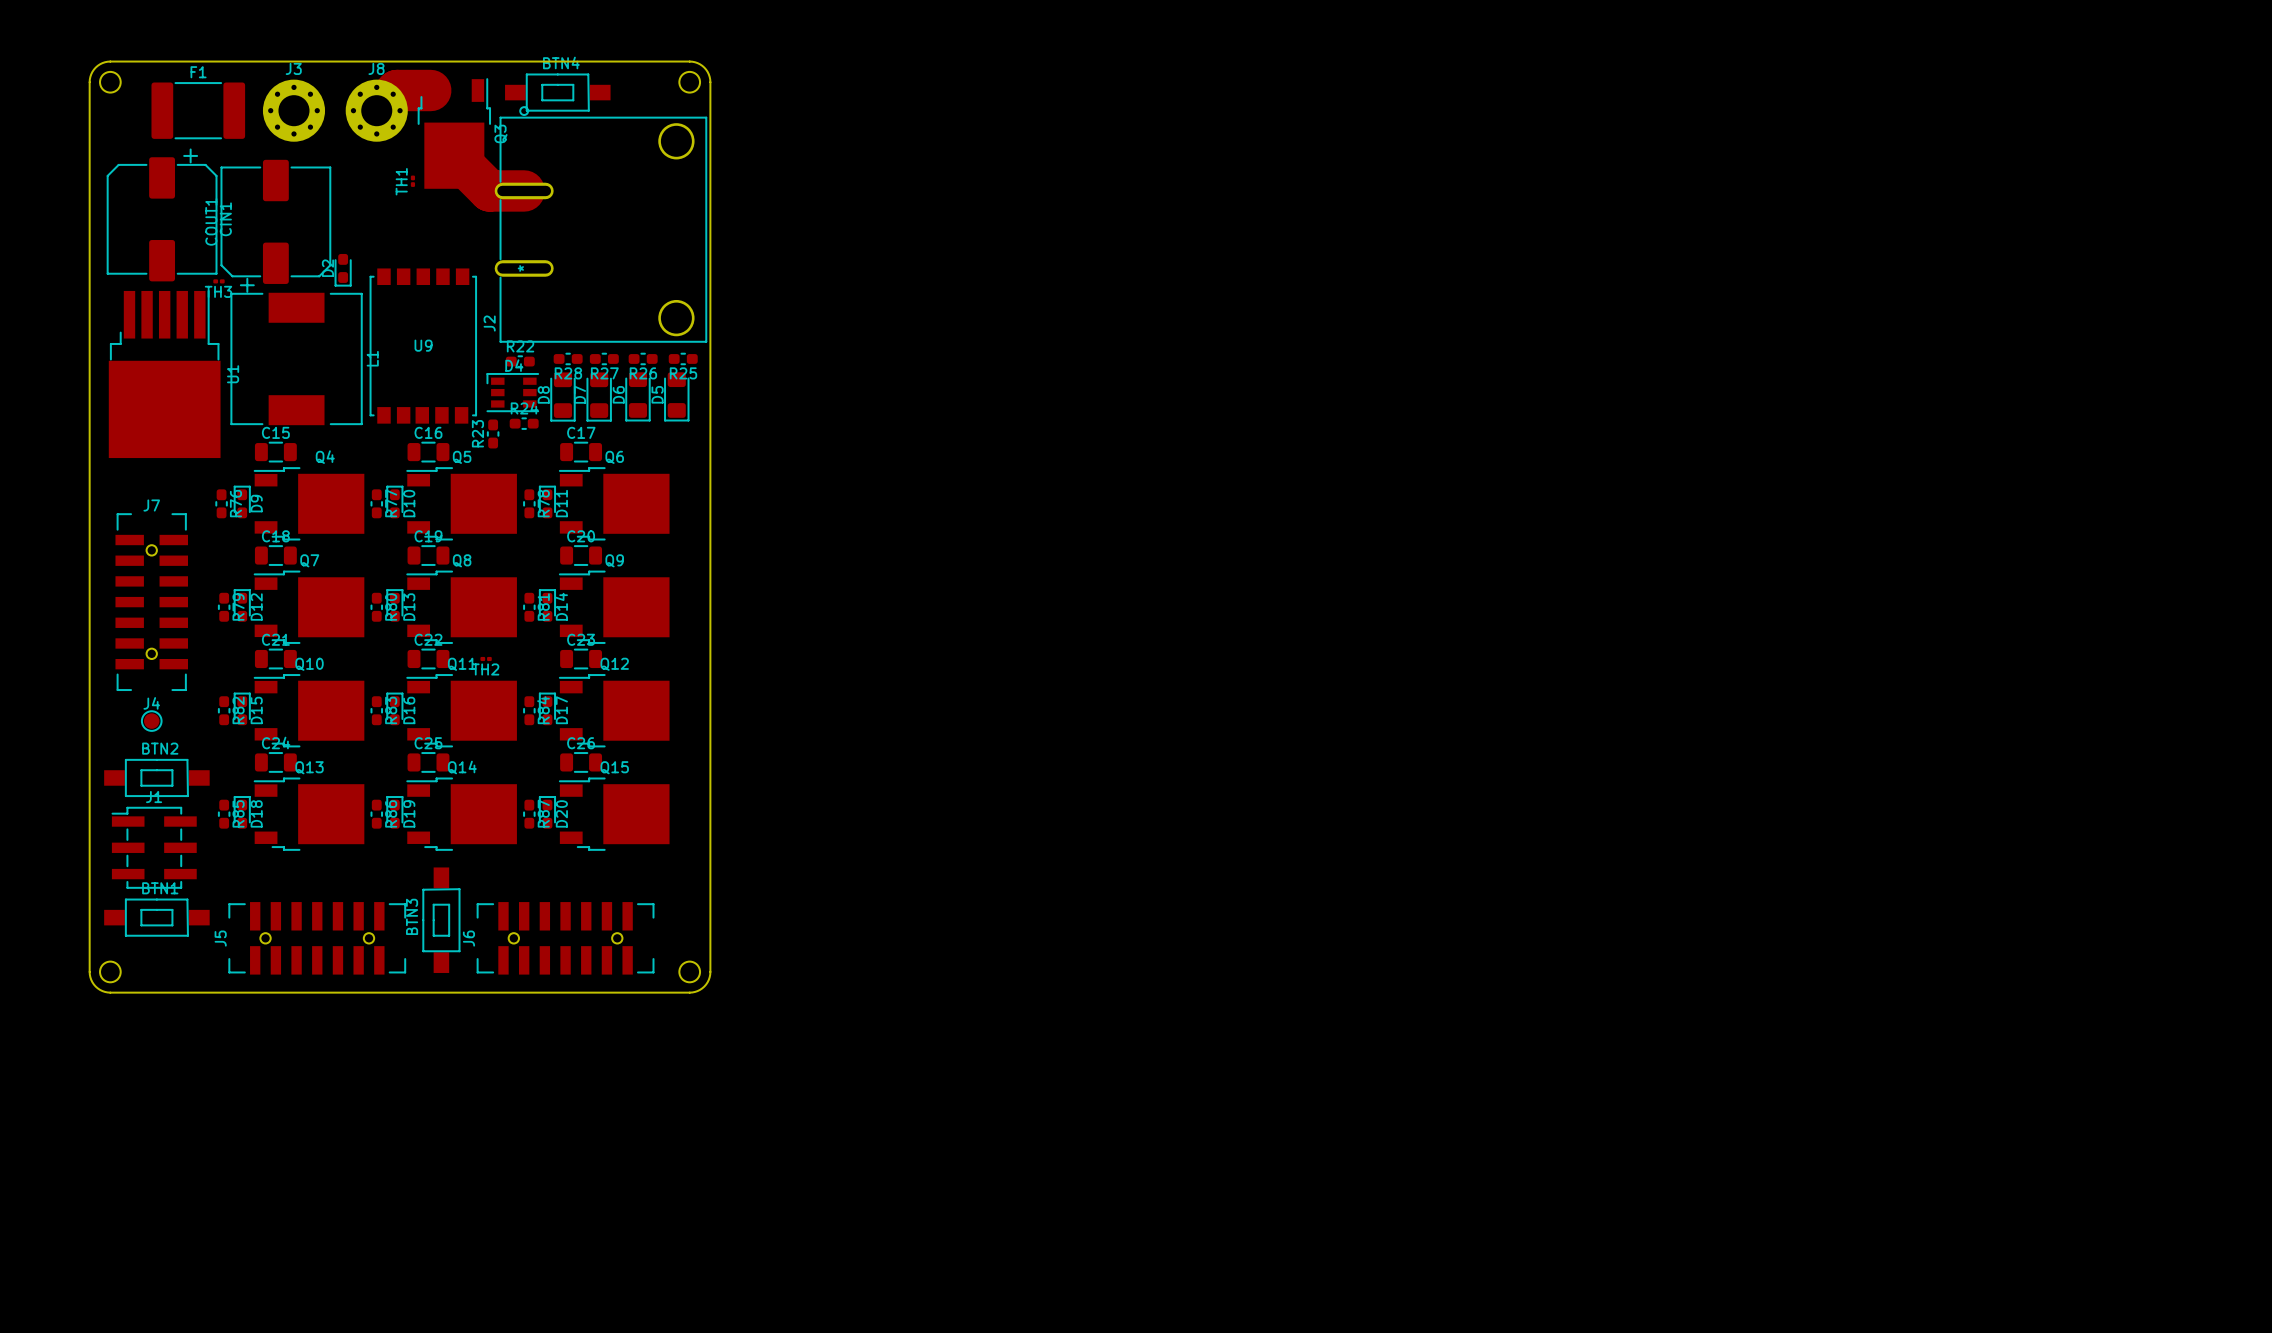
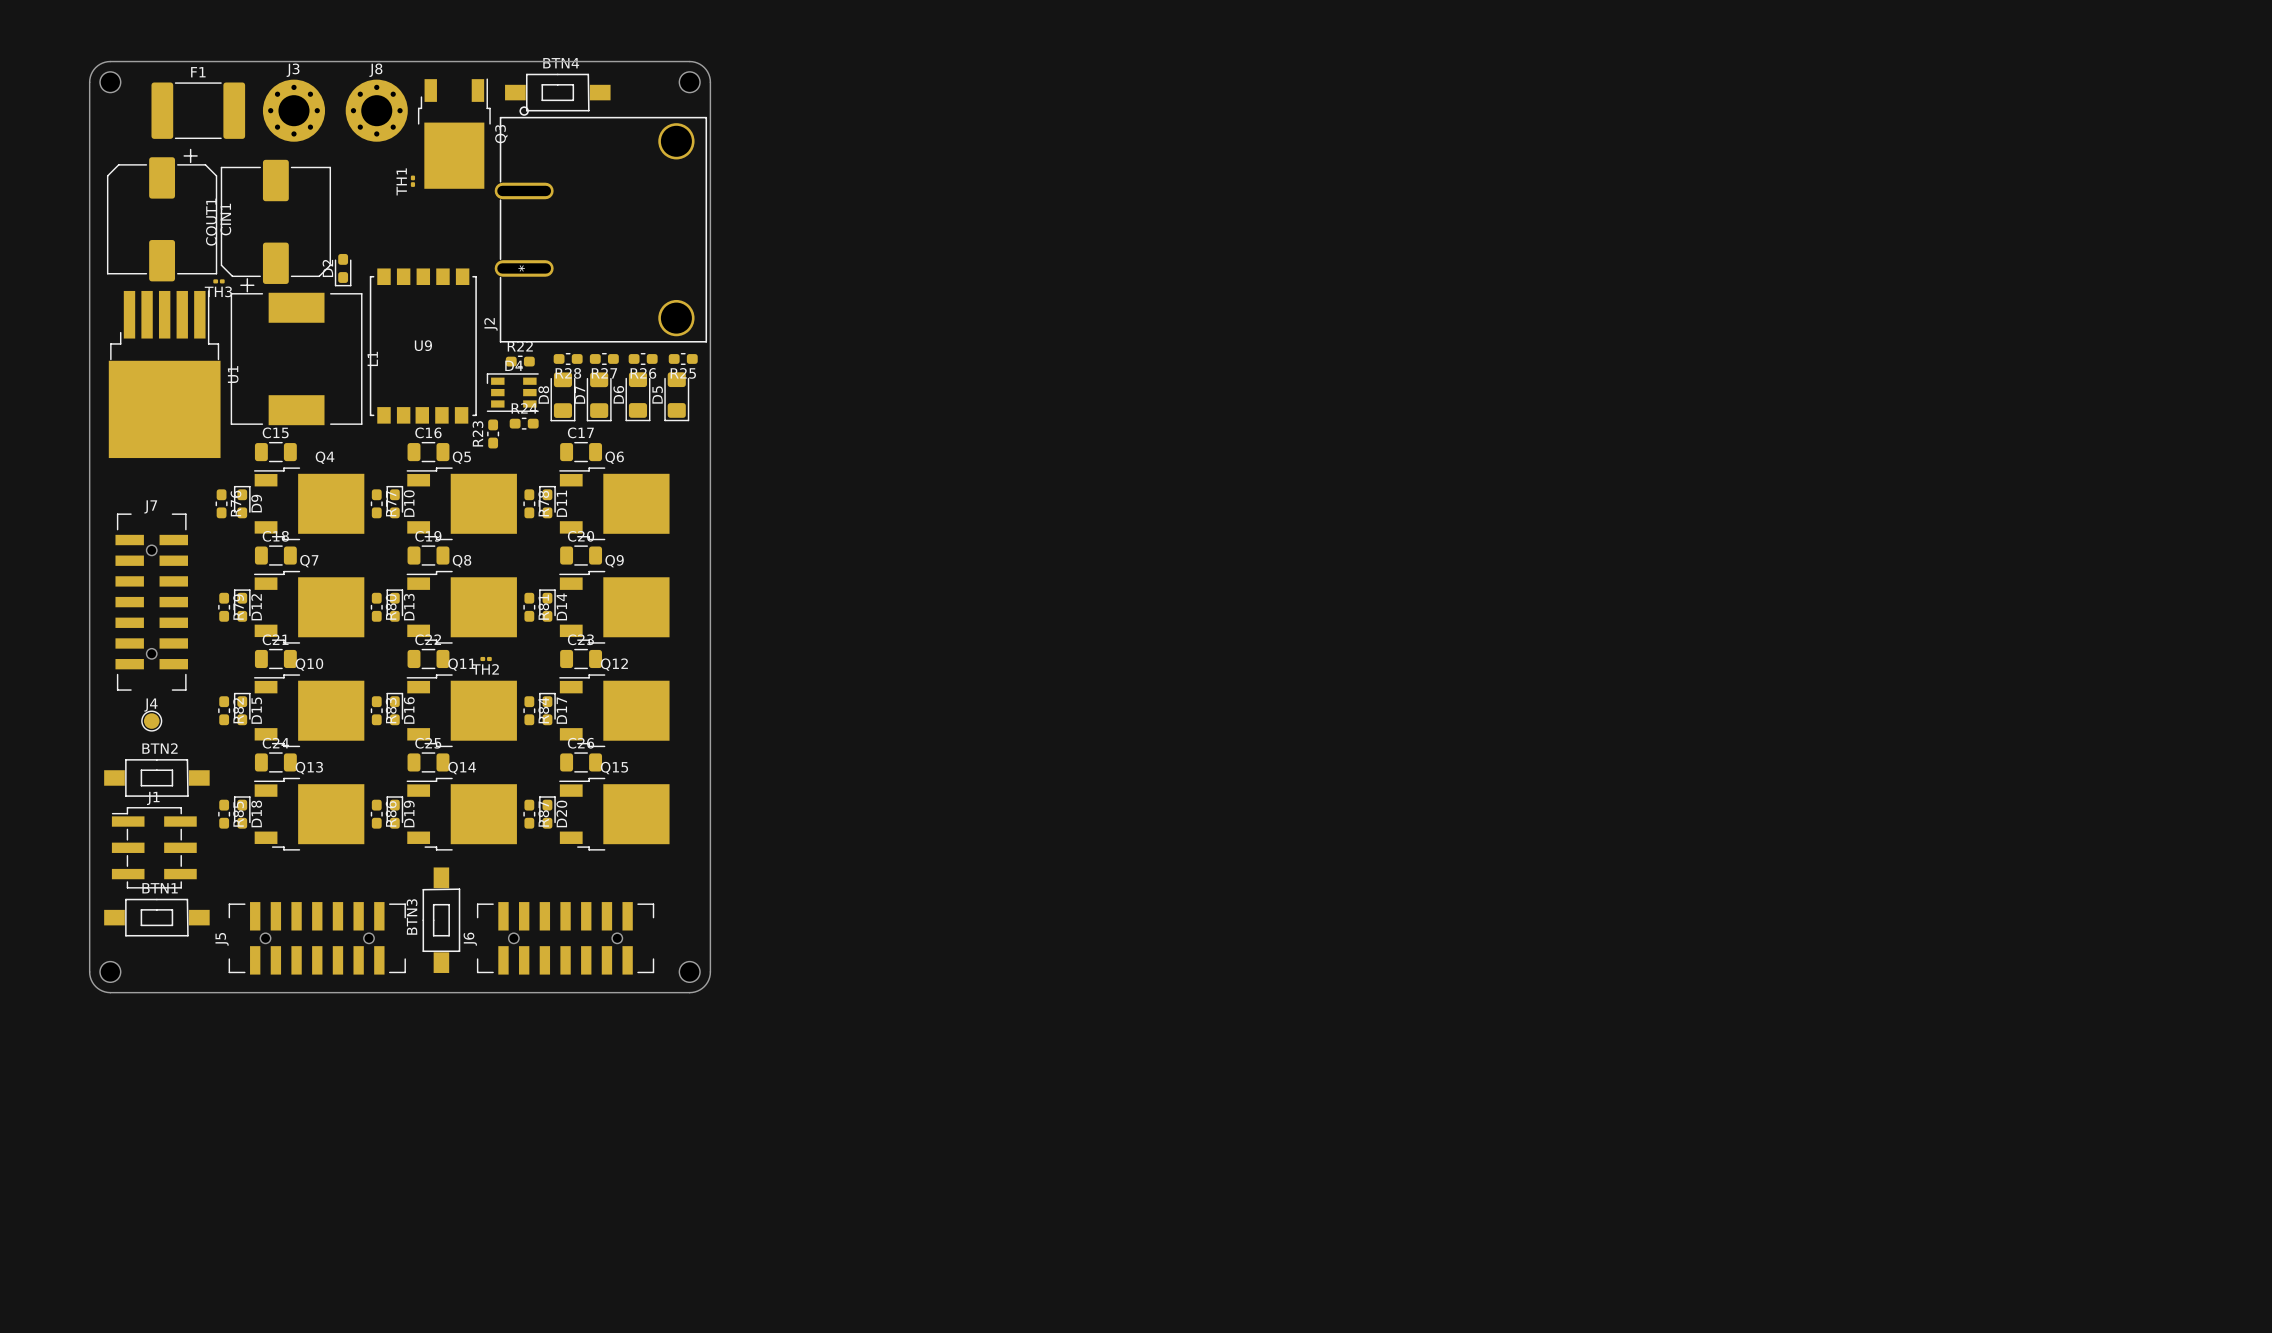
track: (430, 90) (396, 90) (376, 110) -> none
track: (454, 155) (489, 190) (524, 190) -> none

